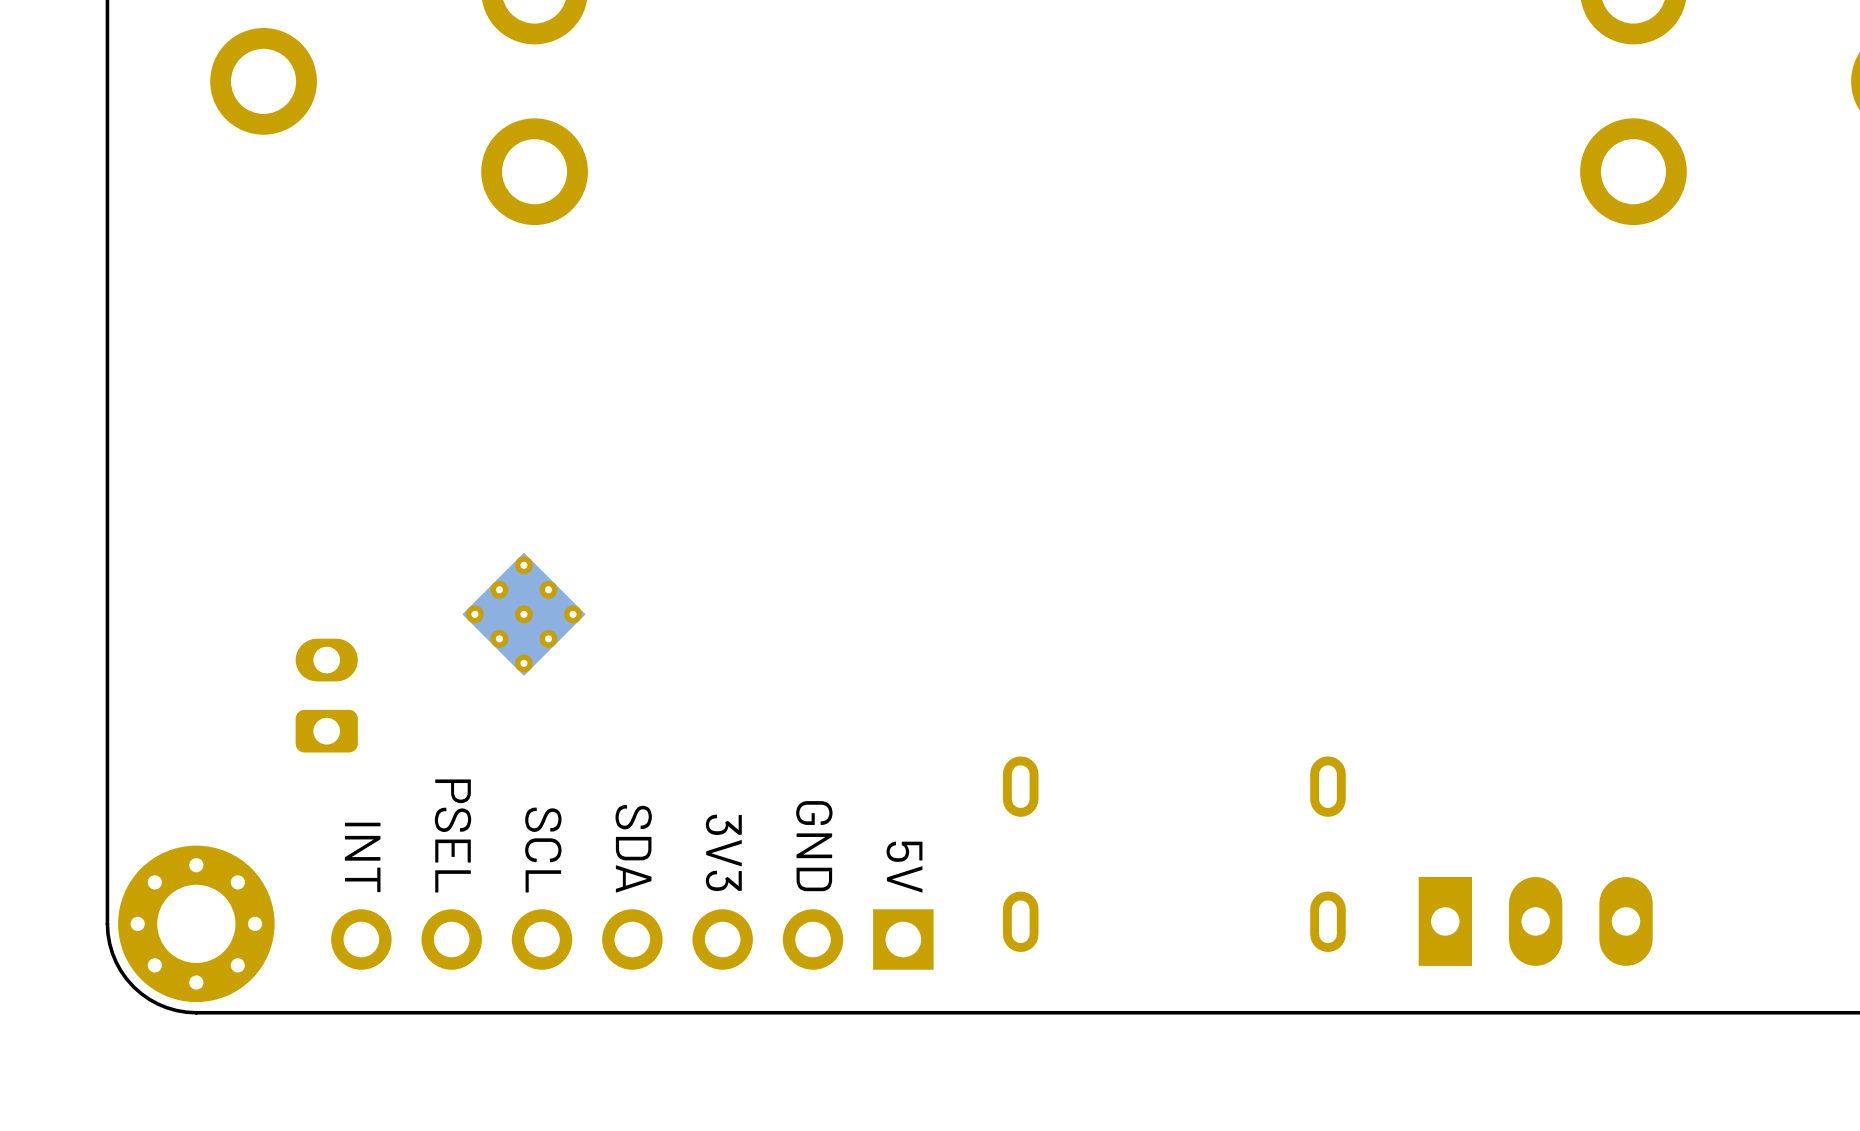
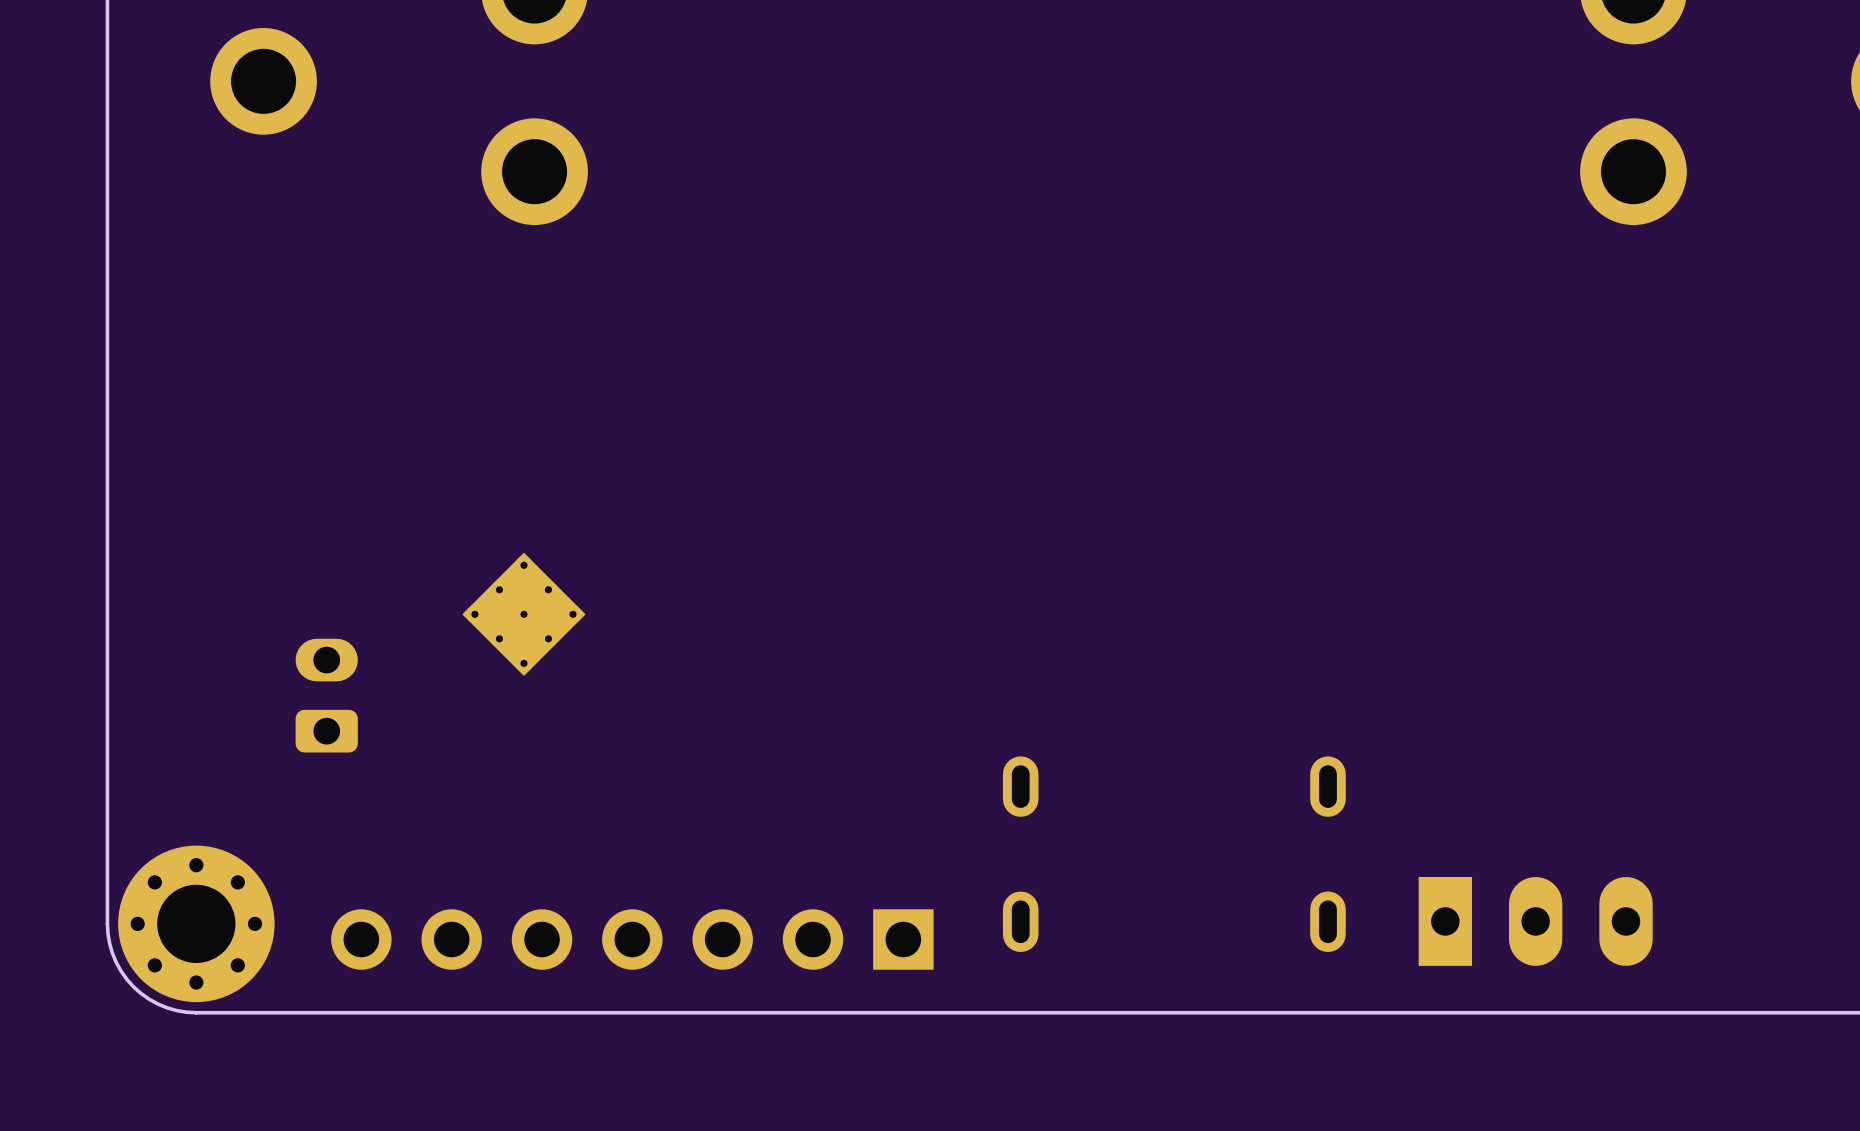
text: PSEL (453, 835) -> none
text: GND (814, 846) -> none
text: SDA (633, 848) -> none
text: SCL (543, 850) -> none
text: 3V3 (723, 852) -> none
text: INT (362, 857) -> none
text: 5V (904, 867) -> none

